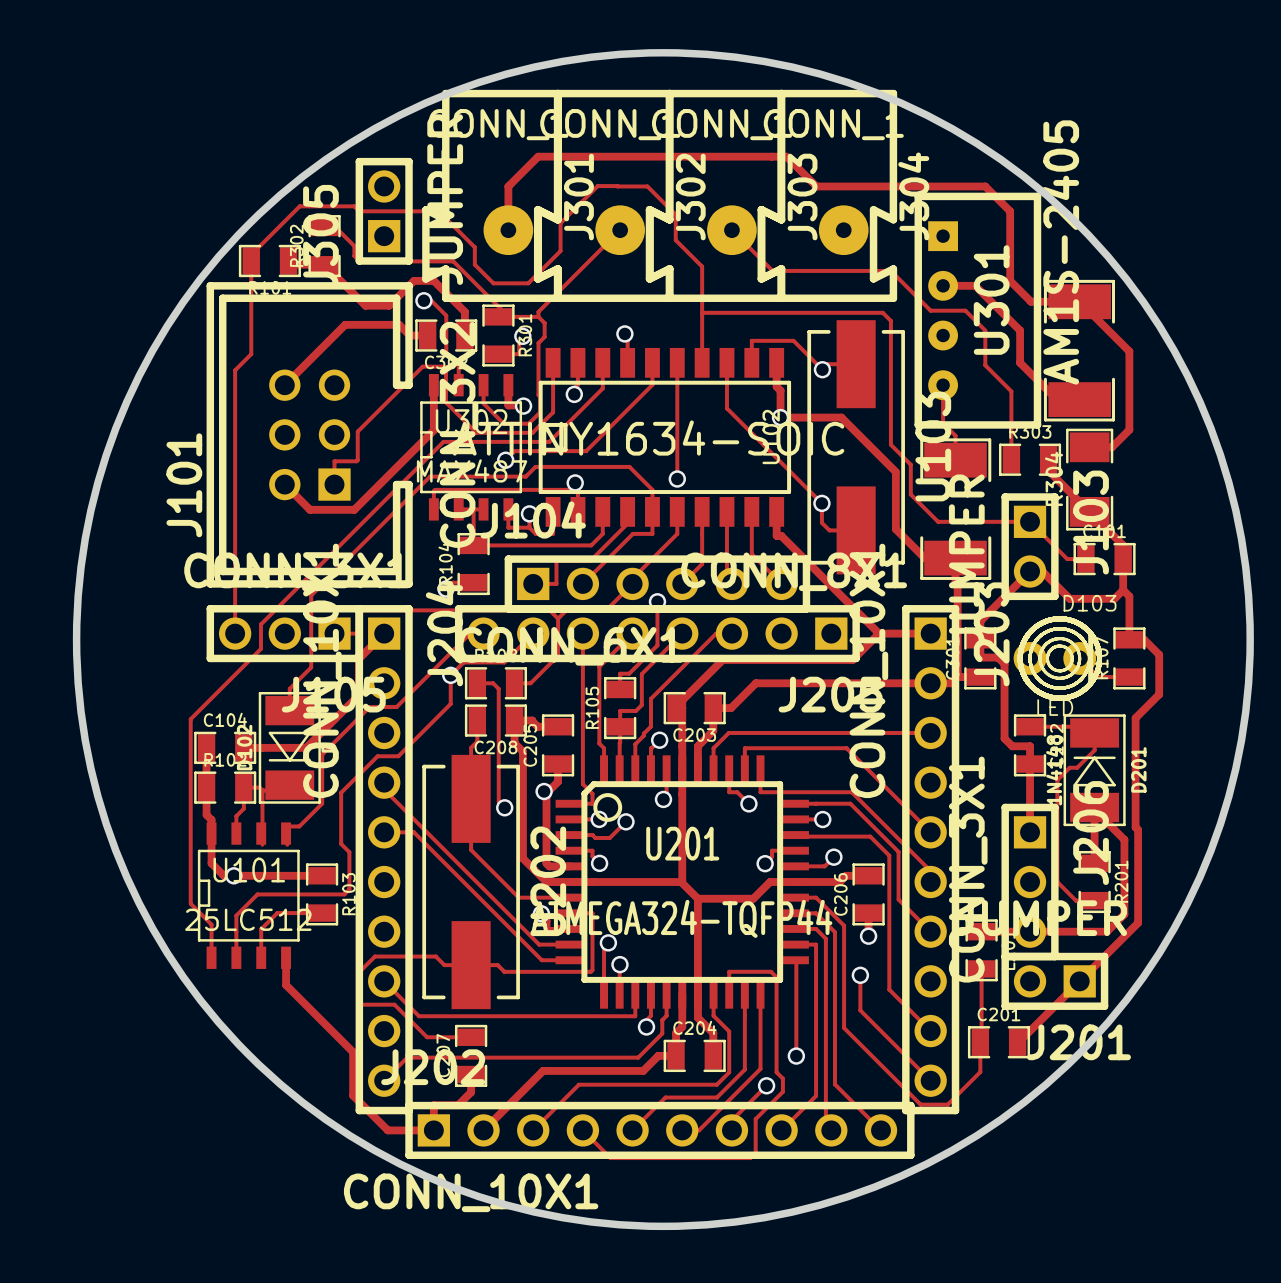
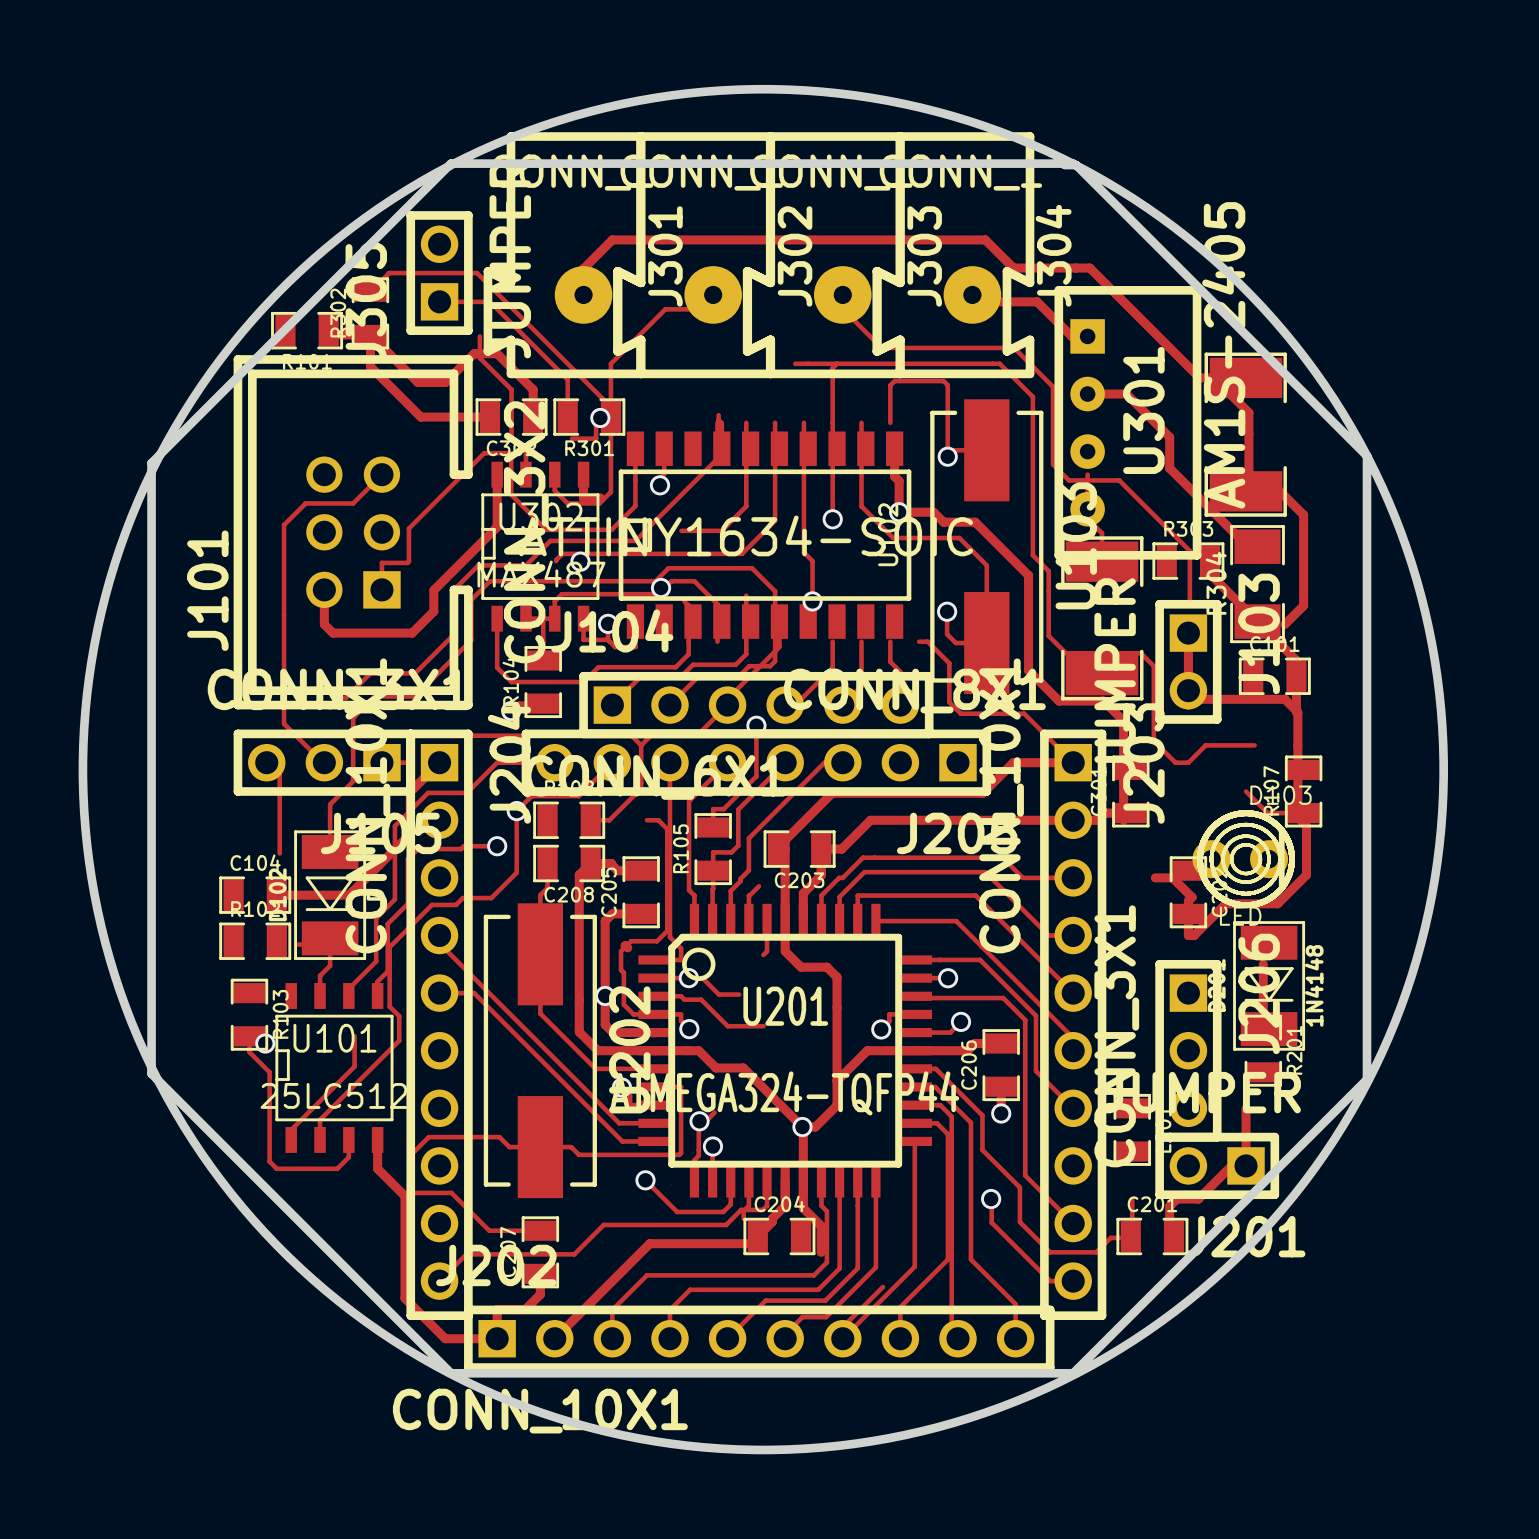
board edge: none -> (1073, 163) (451, 163) (151, 463) (151, 1073) (451, 1373) (1073, 1373) (1366, 1079) (1366, 455) (1076, 165) (1064, 165)
track: (508, 207) (508, 186) (538, 156) (786, 156) (816, 186) (985, 186) (1010, 211) (1010, 280) (1031, 301) (1039, 301) -> (583, 268) (612, 239) (985, 239) (1013, 268) (1089, 268) (1199, 377)
track: (359, 211) (354, 206) (299, 206) (251, 254) (251, 354) (235, 370) (235, 633) -> (279, 853) (279, 775) (266, 762)
track: (416, 211) (438, 211) (474, 247) (474, 264) (493, 283) (528, 283) (560, 251) (560, 223) (597, 186) (647, 186) (675, 214) (675, 240) (702, 266) (702, 362) -> (477, 273) (610, 406)
track: (324, 227) (335, 227) (354, 246) (354, 256) (359, 261) (453, 261) (508, 316) -> (370, 291) (389, 273) (410, 273)
track: (620, 230) (538, 311) (538, 316) -> none
track: (731, 230) (772, 270) (890, 270) (930, 310) (965, 310) (985, 330) (985, 365) (1011, 391) (1011, 459) -> none
track: none -> (439, 301) (489, 301) (567, 379) (567, 417)
track: none -> (843, 309) (881, 347) (1014, 347) (1053, 386) (1053, 464) (1068, 480) (1119, 480) (1189, 550) (1189, 604)
track: none -> (972, 309) (979, 301) (1037, 301) (1071, 336) (1087, 336)
track: (943, 285) (975, 285) (1020, 330) (1020, 362) (1056, 399) (1079, 399) -> none
track: none -> (795, 363) (999, 363) (1032, 396) (1032, 555) (1048, 571) (1048, 635) (1066, 653) (1140, 653) (1153, 666) (1153, 741) (1175, 762) (1188, 762) (1205, 745) (1254, 745)
track: none -> (837, 363) (832, 368) (832, 519)
track: (423, 300) (431, 300) (446, 315) -> (479, 336) (479, 358) (511, 389) (511, 394)
via: (423, 300) -> none
track: (1052, 301) (1079, 301) (1129, 351) (1129, 419) -> (1214, 377) (1248, 412) (1248, 473) (1264, 489) (1277, 489) (1303, 514)
U301 position: (977, 310) -> (1127, 422)
track: (702, 312) (882, 312) (890, 320) (890, 444) (910, 464) (910, 494) (938, 521) (1030, 521) (1067, 559) (1085, 559) -> none
track: none -> (1087, 394) (1126, 394) (1169, 437) (1169, 468) (1248, 547)
track: (498, 316) (538, 316) -> none
track: (538, 316) (544, 323) (544, 336) (538, 343) (539, 412) (528, 423) (503, 423) (483, 403) (483, 398) -> (713, 309) (665, 309) (610, 363) (610, 491) (599, 503) (567, 503) (554, 490)
via: (624, 333) -> none
track: (409, 335) (399, 324) (345, 324) (284, 385) -> (469, 417) (420, 417) (370, 366) (370, 334)
R301 rotation: 0° (498, 335) -> 90° clockwise (589, 417)
track: none -> (717, 422) (717, 458) (635, 540) (550, 540) (525, 565) (478, 565) (455, 588) (455, 633) (415, 673) (370, 673) (345, 697) (340, 697) (330, 707)
track: none -> (746, 422) (746, 506) (721, 530) (681, 530)
track: none -> (775, 422) (775, 520) (741, 553) (562, 553) (556, 561)
track: none -> (803, 422) (803, 552) (812, 561) (812, 601)
track: none -> (861, 422) (861, 506) (893, 538) (959, 538) (986, 565) (986, 643)
track: (602, 362) (602, 388) (549, 441) (443, 441) (260, 624) (260, 648) (190, 719) (190, 903) (211, 924) (211, 957) -> none
track: (652, 362) (652, 384) (586, 451) (514, 451) (505, 460) -> none
track: (677, 362) (677, 479) -> none
track: (726, 362) (726, 408) (821, 503) -> none
track: (751, 362) (751, 340) (793, 340) (822, 369) -> (890, 422) (890, 385) (894, 381) (943, 381) (947, 385) (947, 456)
track: none -> (381, 474) (353, 503) (305, 503) (284, 525) (284, 723) (324, 762)
via: (523, 406) -> none
track: (810, 417) (841, 417) (895, 472) (895, 529) (924, 558) (955, 558) (955, 584) (957, 586) (957, 677) -> (933, 512) (943, 522) (975, 522) (1028, 575) (1028, 670) (1059, 701) (1103, 701) (1123, 720) (1123, 820)
via: none -> (832, 519)
track: (1129, 429) (1112, 447) (1089, 447) -> (1303, 526) (1303, 605) (1284, 624)
via position: (677, 479) -> (812, 601)
track: (284, 484) (310, 509) (354, 509) (379, 484) -> (324, 589) (324, 624) (332, 633) (412, 633) (433, 611) (433, 590)
track: (433, 509) (435, 489) (577, 489) (577, 511) -> (497, 618) (497, 667) (511, 682) (583, 682) (598, 667) (675, 667) (688, 654) (688, 605) (684, 601)
track: none -> (554, 618) (554, 601) (561, 594) (658, 594) (671, 581) (694, 581) (717, 604) (717, 641)
track: (602, 511) (602, 533) (591, 545) (473, 545) -> none
track: (627, 511) (627, 523) (590, 560) (557, 560) (556, 583) (533, 583) -> (746, 595) (746, 654) (735, 664) (693, 664) (680, 677) (639, 677) (612, 705)
track: (702, 511) (702, 564) (682, 583) -> (832, 641) (832, 667) (795, 705) (785, 705)
track: (726, 511) (726, 578) (731, 583) -> (861, 641) (861, 686) (842, 705)
track: (751, 511) (751, 554) (781, 583) -> (890, 641) (890, 661) (900, 671) (900, 705)
track: (776, 511) (776, 535) (781, 535) (879, 633) -> none
track: none -> (919, 641) (927, 641) (949, 663) (949, 702) (960, 713) (1024, 713) (1073, 762)
track: (607, 559) (632, 533) (652, 533) (652, 489) (629, 466) (535, 466) (525, 476) (430, 476) (311, 595) (311, 667) (289, 688) -> (698, 676) (739, 676) (749, 666) (770, 666) (775, 661) (775, 591) (752, 568) (668, 568) (655, 581) (489, 581) (471, 599) (471, 640) (415, 696) (374, 696) (353, 718) (353, 781) (330, 804) (330, 826)
track: (470, 633) (396, 707) (369, 707) (322, 754) (322, 803) (299, 826) (287, 826) (287, 844) -> (539, 762) (497, 762) (466, 792) (428, 792) (394, 826) (394, 899) (376, 918) (376, 961) (348, 988) (348, 995)
D103 position: (1057, 658) -> (1243, 859)
track: (477, 683) (493, 683) (498, 688) (498, 801) (504, 807) -> none
track: none -> (646, 820) (658, 820) (667, 829) (667, 931) (657, 941) (631, 941) (621, 951) (621, 970) (623, 972) (623, 1004) (633, 1014) (655, 1014)
track: (450, 703) (404, 750) -> (516, 844) (516, 872) (491, 898) (462, 898)
via: none -> (497, 846)
track: none -> (497, 847) (464, 846) (461, 849) (417, 849) (407, 859) (407, 903) (387, 923) (387, 971) (377, 981) (377, 995)
track: (514, 720) (514, 743) (522, 751) (522, 858) (546, 882) -> (590, 863) (579, 875) (579, 1031) (597, 1050) (627, 1050)
track: (1030, 726) (1088, 726) (1094, 732) (1094, 750) (1077, 767) (1069, 767) (1057, 780) (1057, 882) (1075, 900) (1094, 900) -> none
track: (731, 732) (887, 732) -> (842, 877) (862, 857) (1002, 857) (1022, 877)
via: (659, 740) -> none
track: (206, 747) (206, 814) (211, 819) (211, 863) (223, 875) (322, 875) -> none
track: (1030, 752) (1030, 746) (1012, 746) (1004, 738) (1004, 664) (998, 657) (980, 657) (980, 621) (1030, 571) (1042, 571) (1069, 598) (1114, 598) (1123, 590) (1129, 596) (1129, 639) (1144, 639) (1159, 654) (1159, 694) (1135, 718) (1138, 923) (1017, 1042) -> (1188, 900) (1192, 897) (1172, 877) (1155, 877)
track: (558, 764) (558, 781) (546, 793) (546, 863) (549, 866) -> (641, 913) (612, 913) (605, 921) (605, 1024) (612, 1032) (631, 1032)
track: (729, 770) (729, 792) (737, 792) (748, 803) -> (839, 921) (839, 896) (864, 872) (985, 872) (1048, 935) (1073, 935)
track: (760, 770) (760, 792) (851, 792) -> (875, 921) (956, 921) (981, 946)
D201 rotation: 0° (1094, 770) -> 180° (1269, 985)
track: (1030, 782) (1030, 832) -> (1188, 935) (1194, 935) (1225, 903) (1277, 903) (1306, 875) (1306, 826) (1297, 817) (1297, 712) (1284, 699) (1194, 699) (1188, 705) (1189, 647)
track: none -> (330, 938) (330, 965) (320, 975) (320, 995)
via: (544, 791) -> none
track: (682, 796) (681, 882) -> (785, 951) (801, 967) (826, 967) (837, 977) (837, 1105) (815, 1127) (801, 1127)
via: (663, 799) -> none
via: (748, 803) -> none
via: (504, 807) -> none
track: (1094, 809) (1124, 839) (1124, 914) (1107, 931) (981, 931) -> none
track: none -> (688, 978) (702, 978) (718, 994) (739, 994)
track: (625, 821) (609, 837) -> (763, 1026) (727, 1026) (701, 999)
via: (625, 821) -> none
track: (236, 833) (236, 816) (243, 808) (243, 787) (259, 787) (262, 790) (262, 844) -> none
via: none -> (605, 995)
track: none -> (249, 1036) (249, 1052) (269, 1072) (269, 1161) (276, 1168) (337, 1168) (348, 1157) (348, 1140)
track: none -> (354, 1036) (354, 1066) (291, 1129) (291, 1140)
track: (349, 873) (349, 889) (344, 894) (257, 894) (236, 915) (236, 957) -> (399, 1040) (320, 1119) (320, 1140)
track: (607, 882) (681, 882) -> (698, 1050) (716, 1067) (743, 1067) (802, 1127)
track: (681, 882) (697, 898) -> none
track: (770, 882) (753, 898) (697, 898) -> (887, 1050) (867, 1050) (837, 1080)
R103 position: (322, 894) -> (249, 1014)
U101 position: (248, 895) -> (334, 1067)
track: (812, 897) (816, 897) (844, 925) (844, 1028) (920, 1104) (947, 1104) (980, 1072) (981, 1038) -> (935, 1068) (982, 1115) (982, 1150) (1019, 1187) (1019, 1222) (1050, 1252) (1096, 1252) (1110, 1237) (1126, 1237) (1132, 1232)
track: (697, 898) (697, 947) -> none
track: (322, 913) (277, 913) (261, 929) (261, 957) -> none
track: (811, 913) (816, 913) (834, 932) (834, 1084) (880, 1130) -> (935, 1087) (970, 1122) (970, 1259) (1015, 1304) (1015, 1338)
track: none -> (1246, 1108) (1246, 1151) (1198, 1199) (1176, 1199) (1169, 1206) (1169, 1237)
track: (608, 942) (604, 947) (604, 976) -> (714, 1112) (698, 1128) (698, 1155) (694, 1160)
track: (813, 944) (816, 944) (816, 1095) (781, 1130) -> (936, 1123) (947, 1134) (947, 1259) (900, 1307) (900, 1338)
via: none -> (802, 1127)
track: (286, 957) (286, 985) (353, 1052) (353, 1095) (389, 1130) -> (377, 1140) (377, 1168) (405, 1196) (405, 1298) (445, 1338)
track: (794, 960) (796, 962) (796, 1056) -> (914, 1141) (914, 1266) (842, 1338)
track: (981, 968) (981, 1009) -> none
track: (860, 975) (860, 1010) (930, 1080) -> (991, 1199) (991, 1222) (1050, 1281) (1073, 1281)
via position: (860, 975) -> (991, 1199)
track: (384, 981) (419, 1016) (634, 1016) (635, 1014) -> (645, 1180) (677, 1212) (723, 1212) (730, 1204)
via: none -> (645, 1180)
track: (729, 993) (729, 971) (771, 971) (776, 977) (776, 1072) (782, 1078) (782, 1091) (755, 1119) (755, 1152) (750, 1158) (610, 1158) (582, 1130) -> none
track: (682, 1015) (682, 1026) (676, 1033) (676, 1055) (658, 1055) (643, 1070) (543, 1070) -> (785, 1205) (750, 1243) (649, 1243) (623, 1269)
track: (663, 1019) (662, 1033) (638, 1057) (500, 1057) -> (762, 1209) (741, 1209) (726, 1224) (603, 1224) (574, 1254)
track: (718, 1020) (729, 1031) -> (839, 1180) (839, 1223)
track: none -> (826, 1211) (826, 1262) (813, 1275) (646, 1275) (612, 1309) (612, 1338)
via: (646, 1026) -> none
C204 position: (694, 1055) -> (779, 1236)
via: (796, 1056) -> none
track: (729, 1069) (729, 1072) (716, 1084) (578, 1084) (533, 1130) -> (839, 1268) (818, 1289) (690, 1289) (669, 1309) (669, 1338)
via: (766, 1085) -> none
track: (717, 1111) (699, 1130) (682, 1130) -> (826, 1317) (802, 1317) (785, 1334) (785, 1338)

